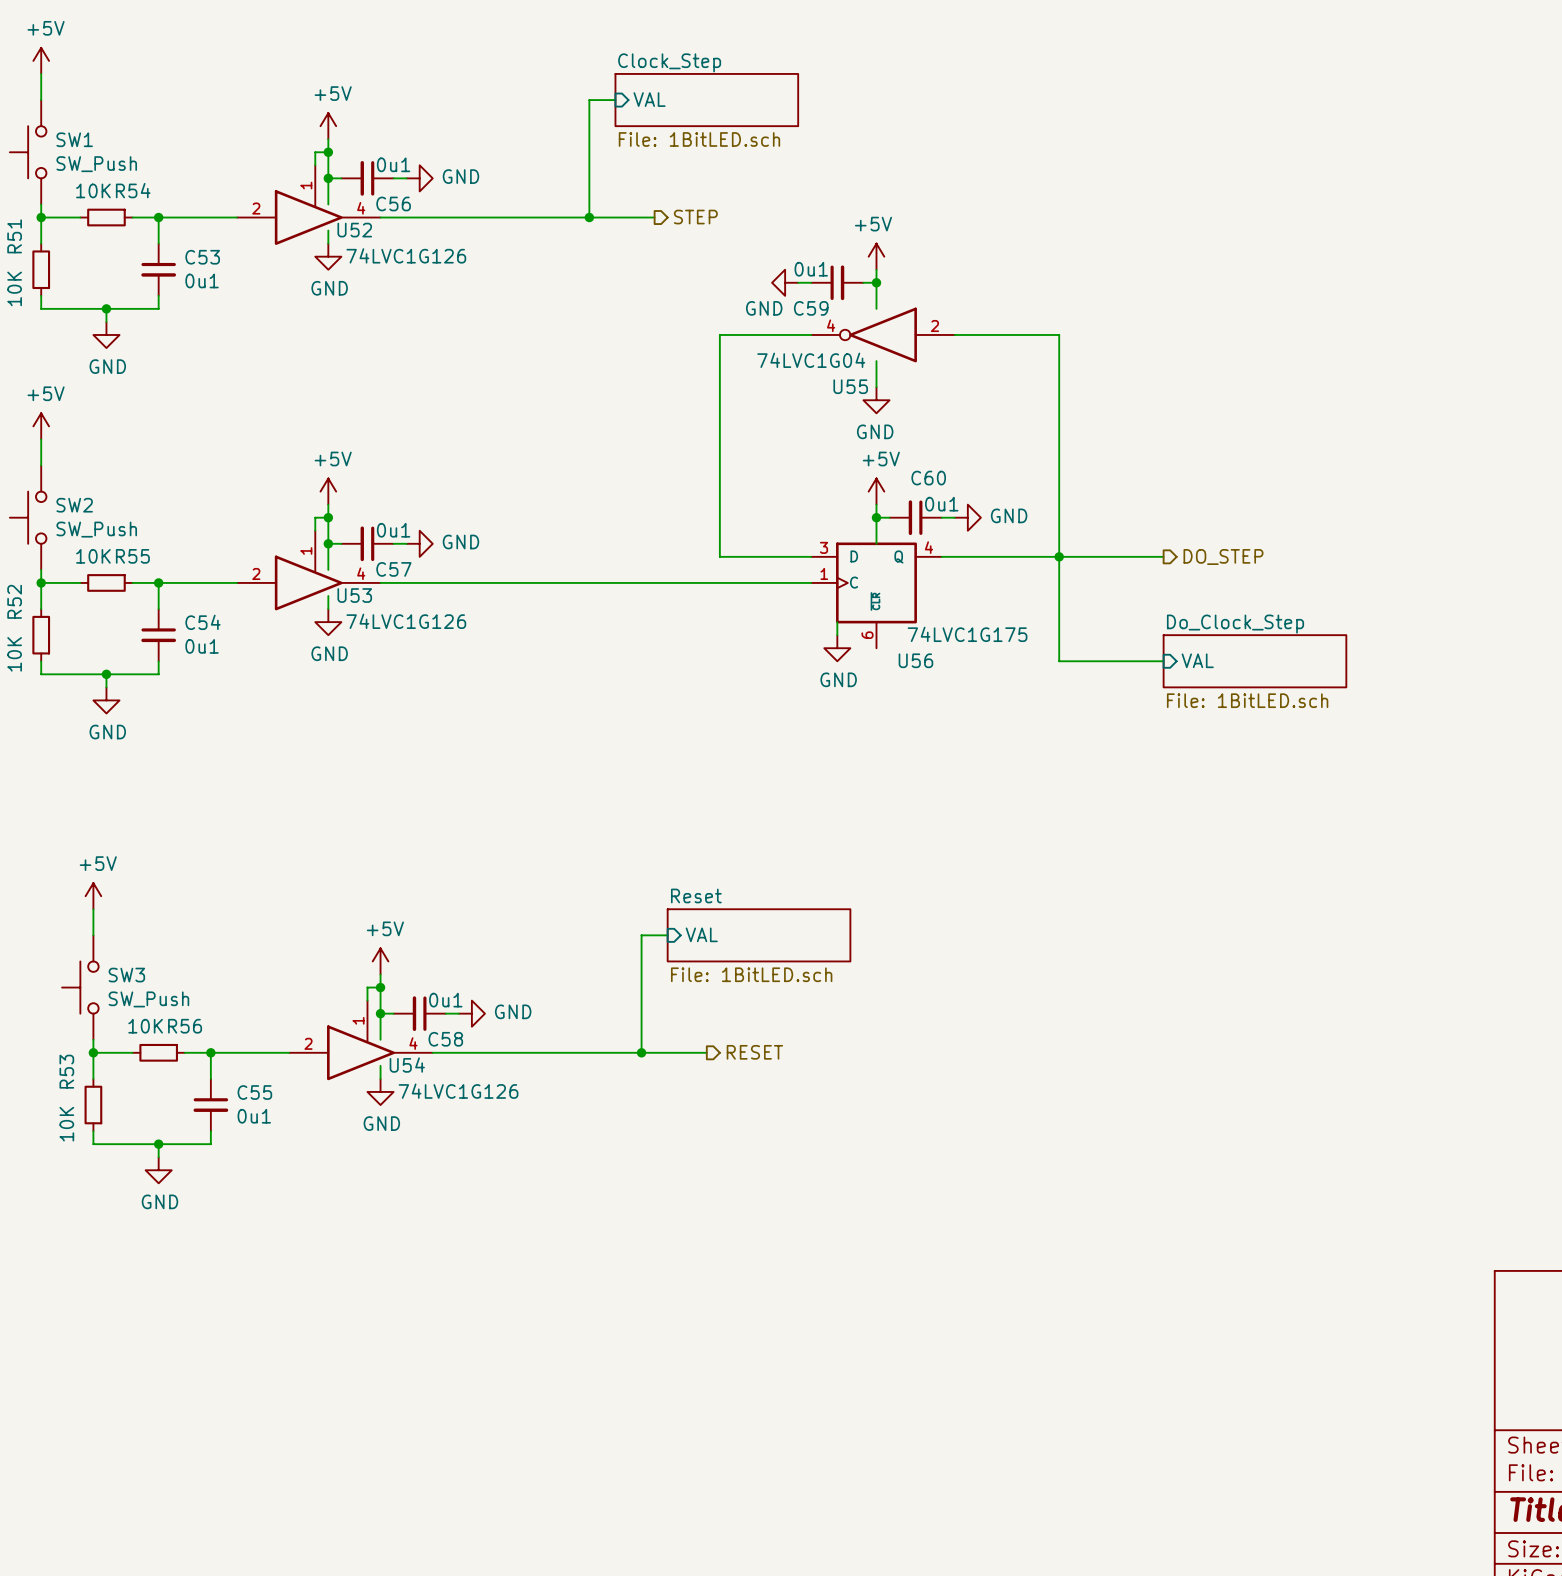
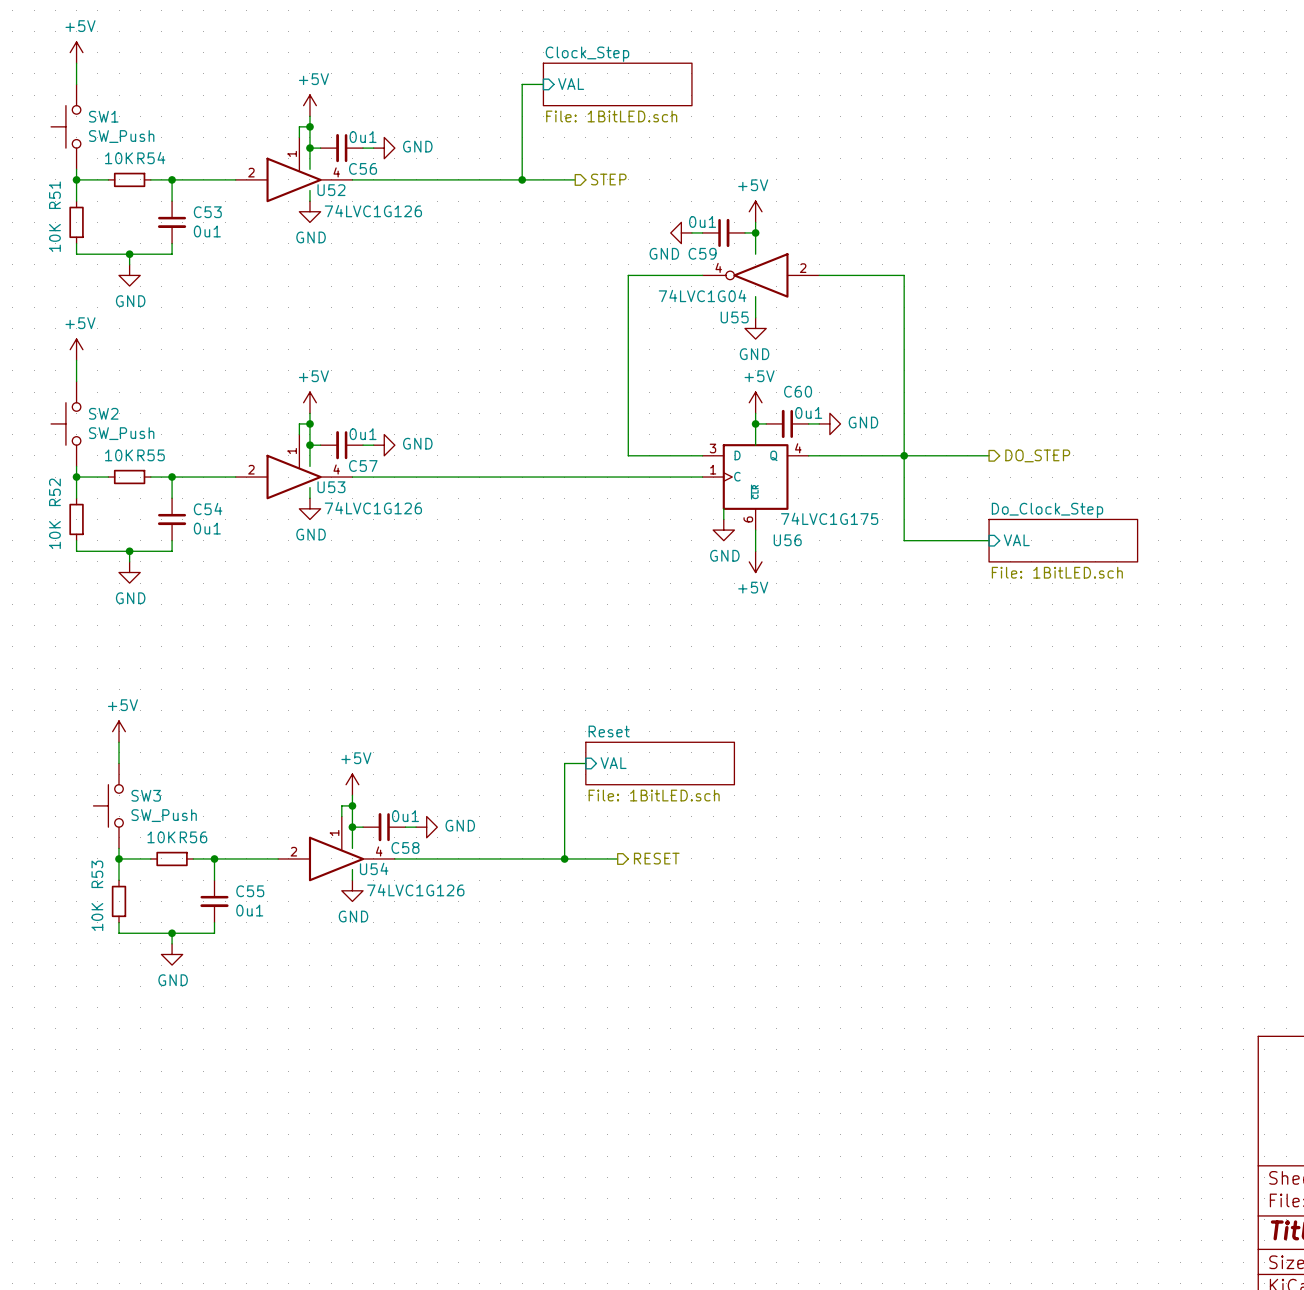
wire: none -> (755, 530) (755, 551)
power symbol: none -> +5V (755, 561)

